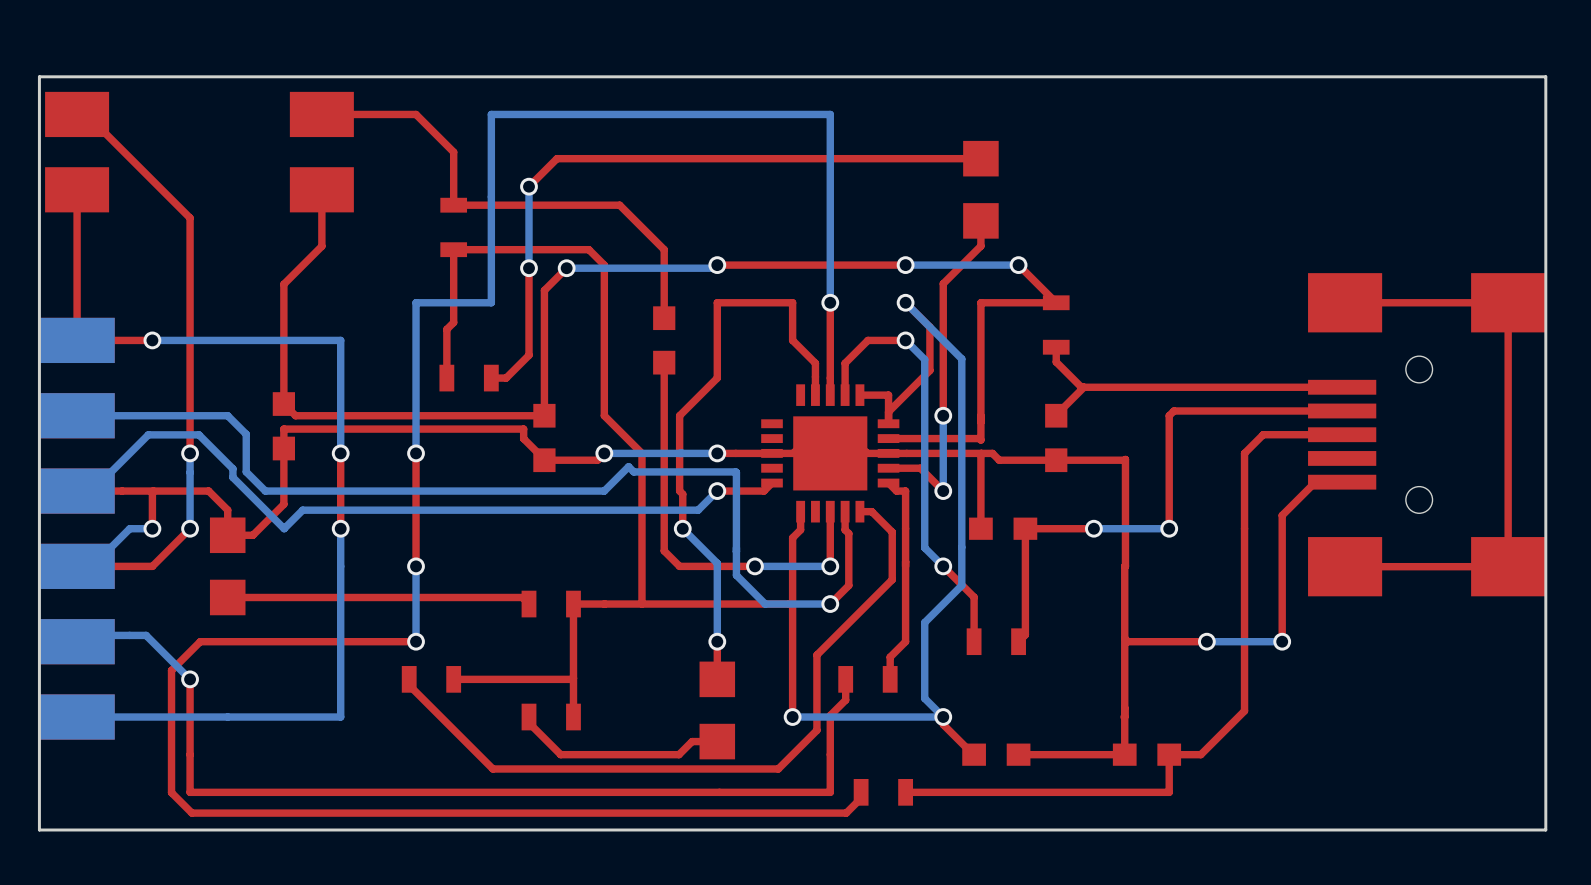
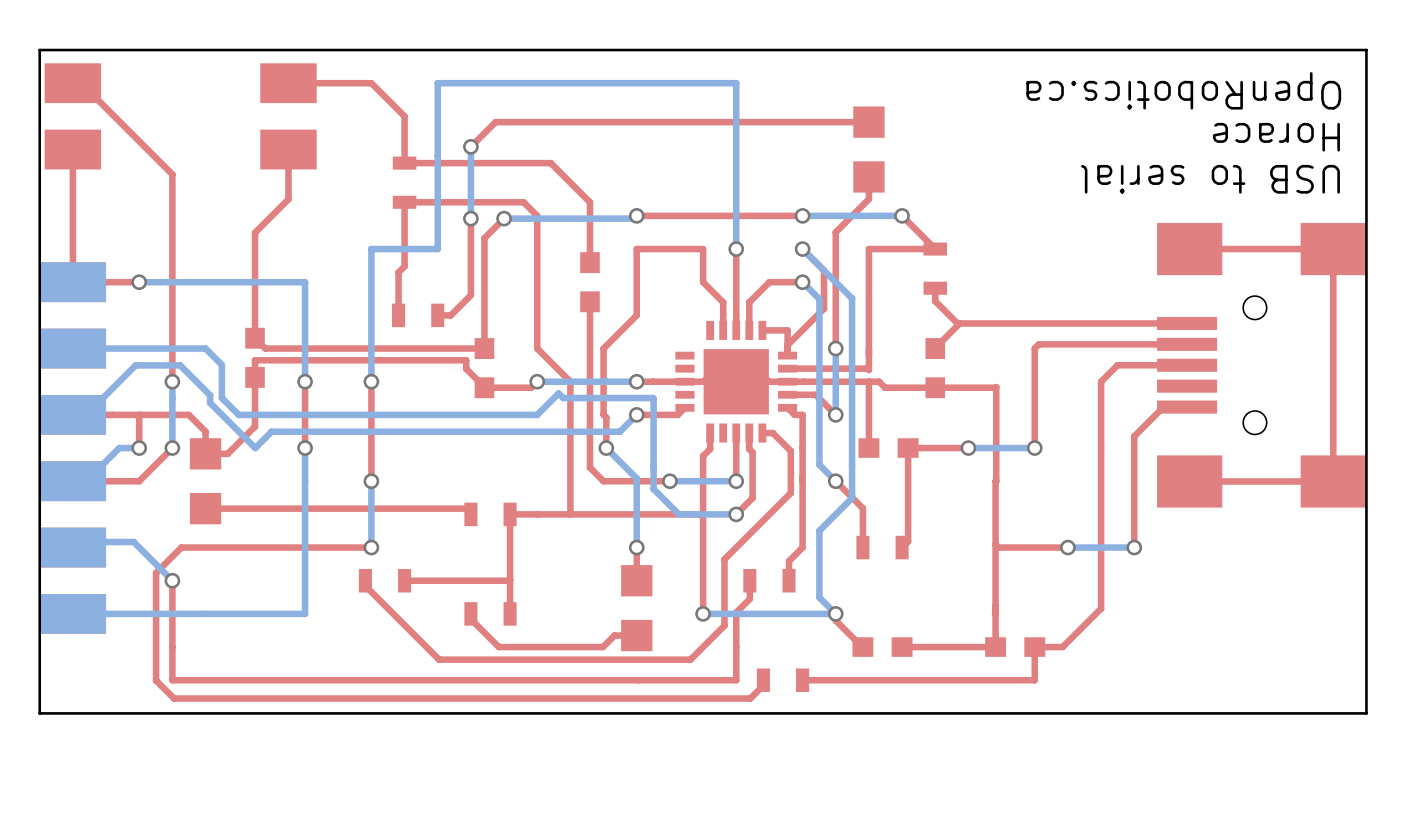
text: none -> OpenRobotics.ca (1183, 90)
text: none -> Horace (1276, 137)
text: none -> USB to serial (1210, 179)

